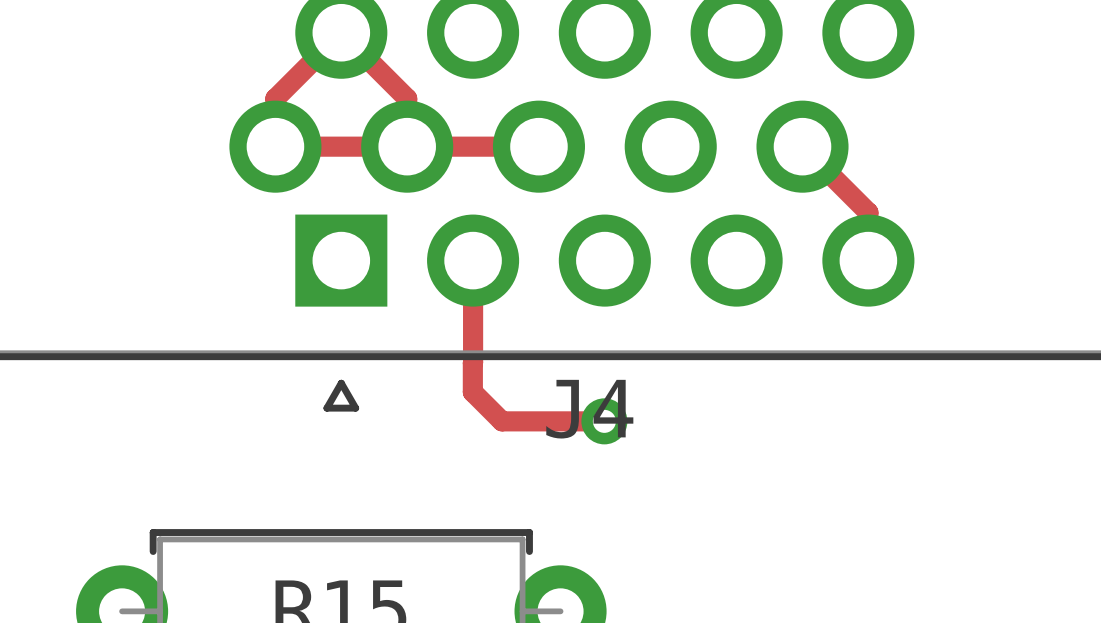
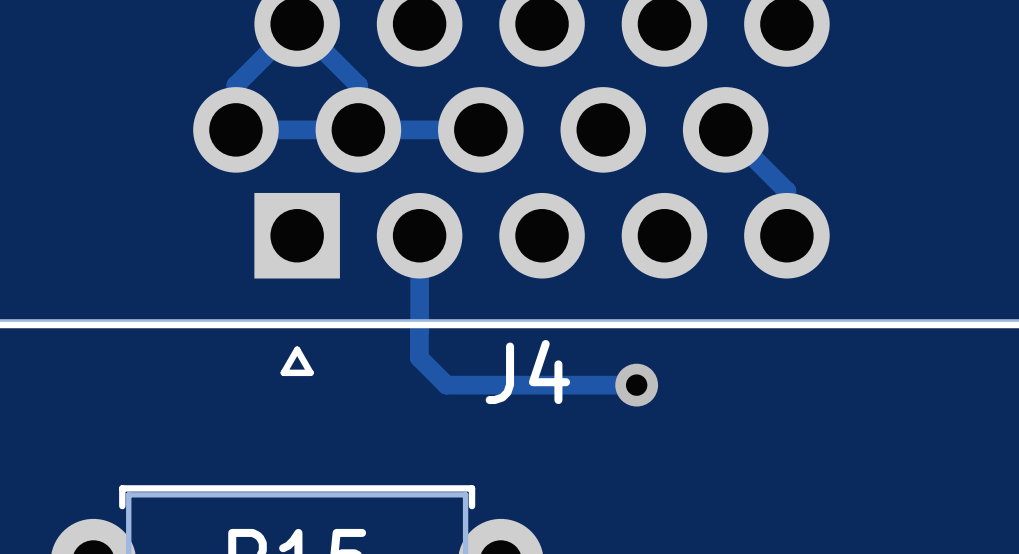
track: none -> (541, 385) (636, 385)
via position: (604, 421) -> (636, 385)

